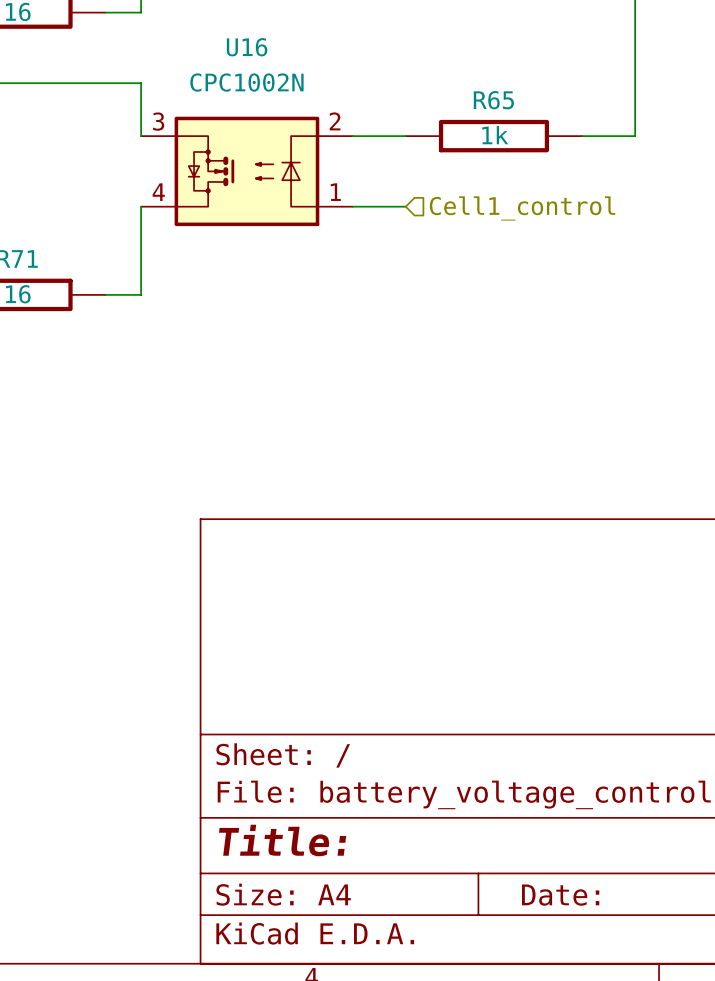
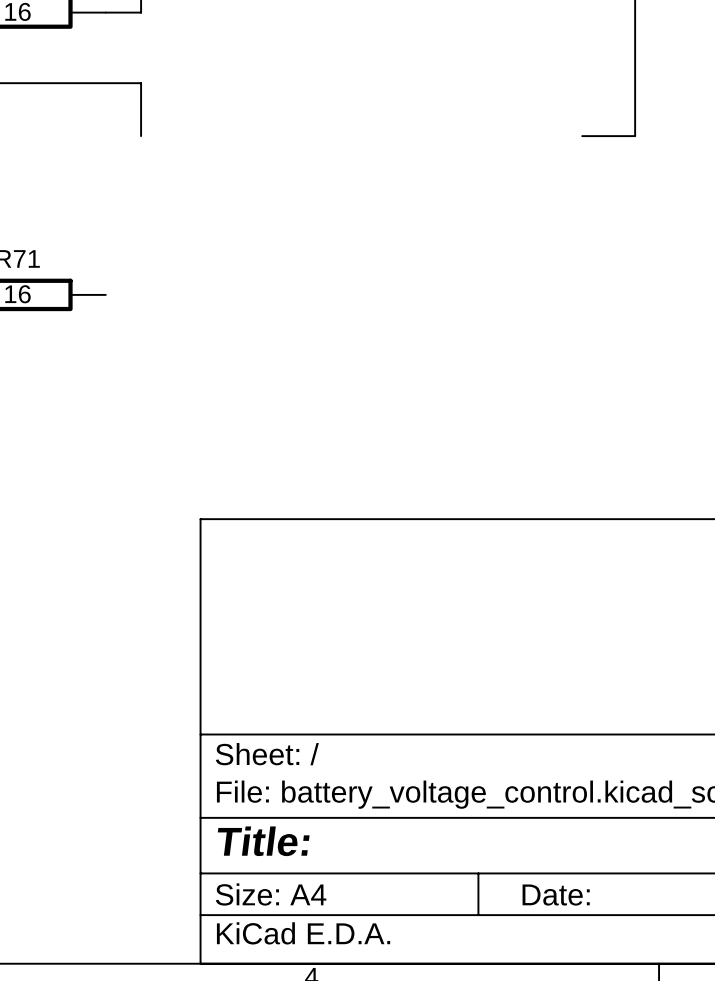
wire: (352, 136) (405, 136) -> none
R65: 1k (493, 136) -> none
U16: CPC1002N (246, 171) -> none
wire: (141, 206) (141, 294) (105, 294) -> none
wire: (352, 206) (405, 206) -> none
hierarchical label: Cell1_control (522, 208) -> none

